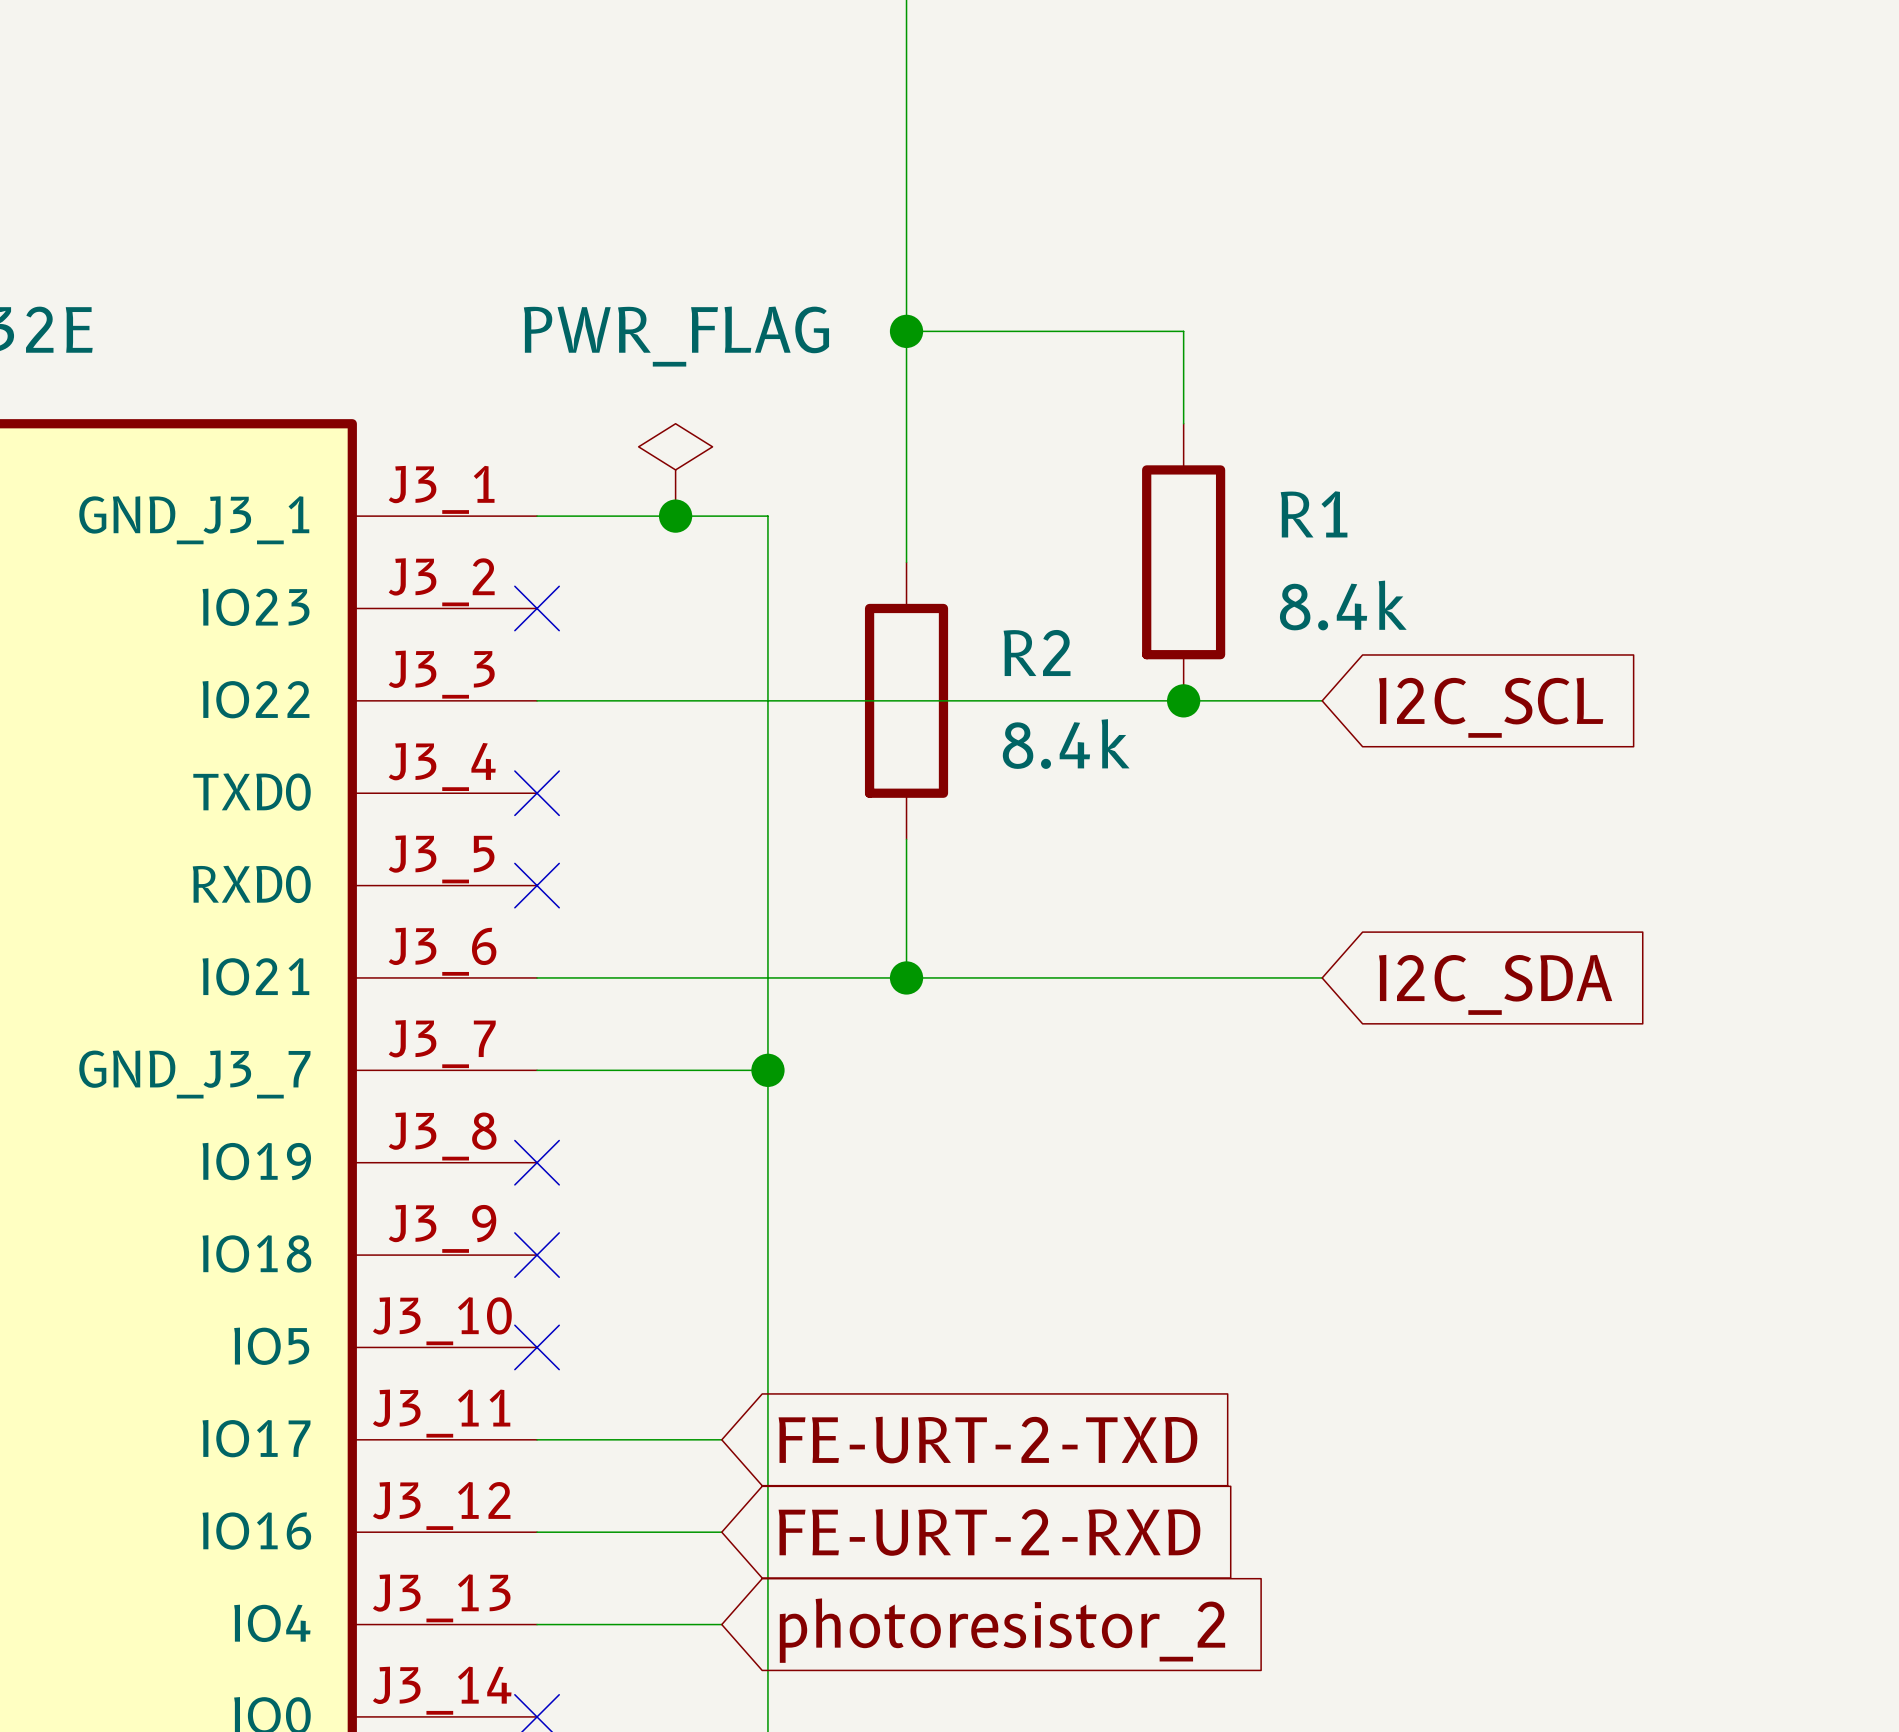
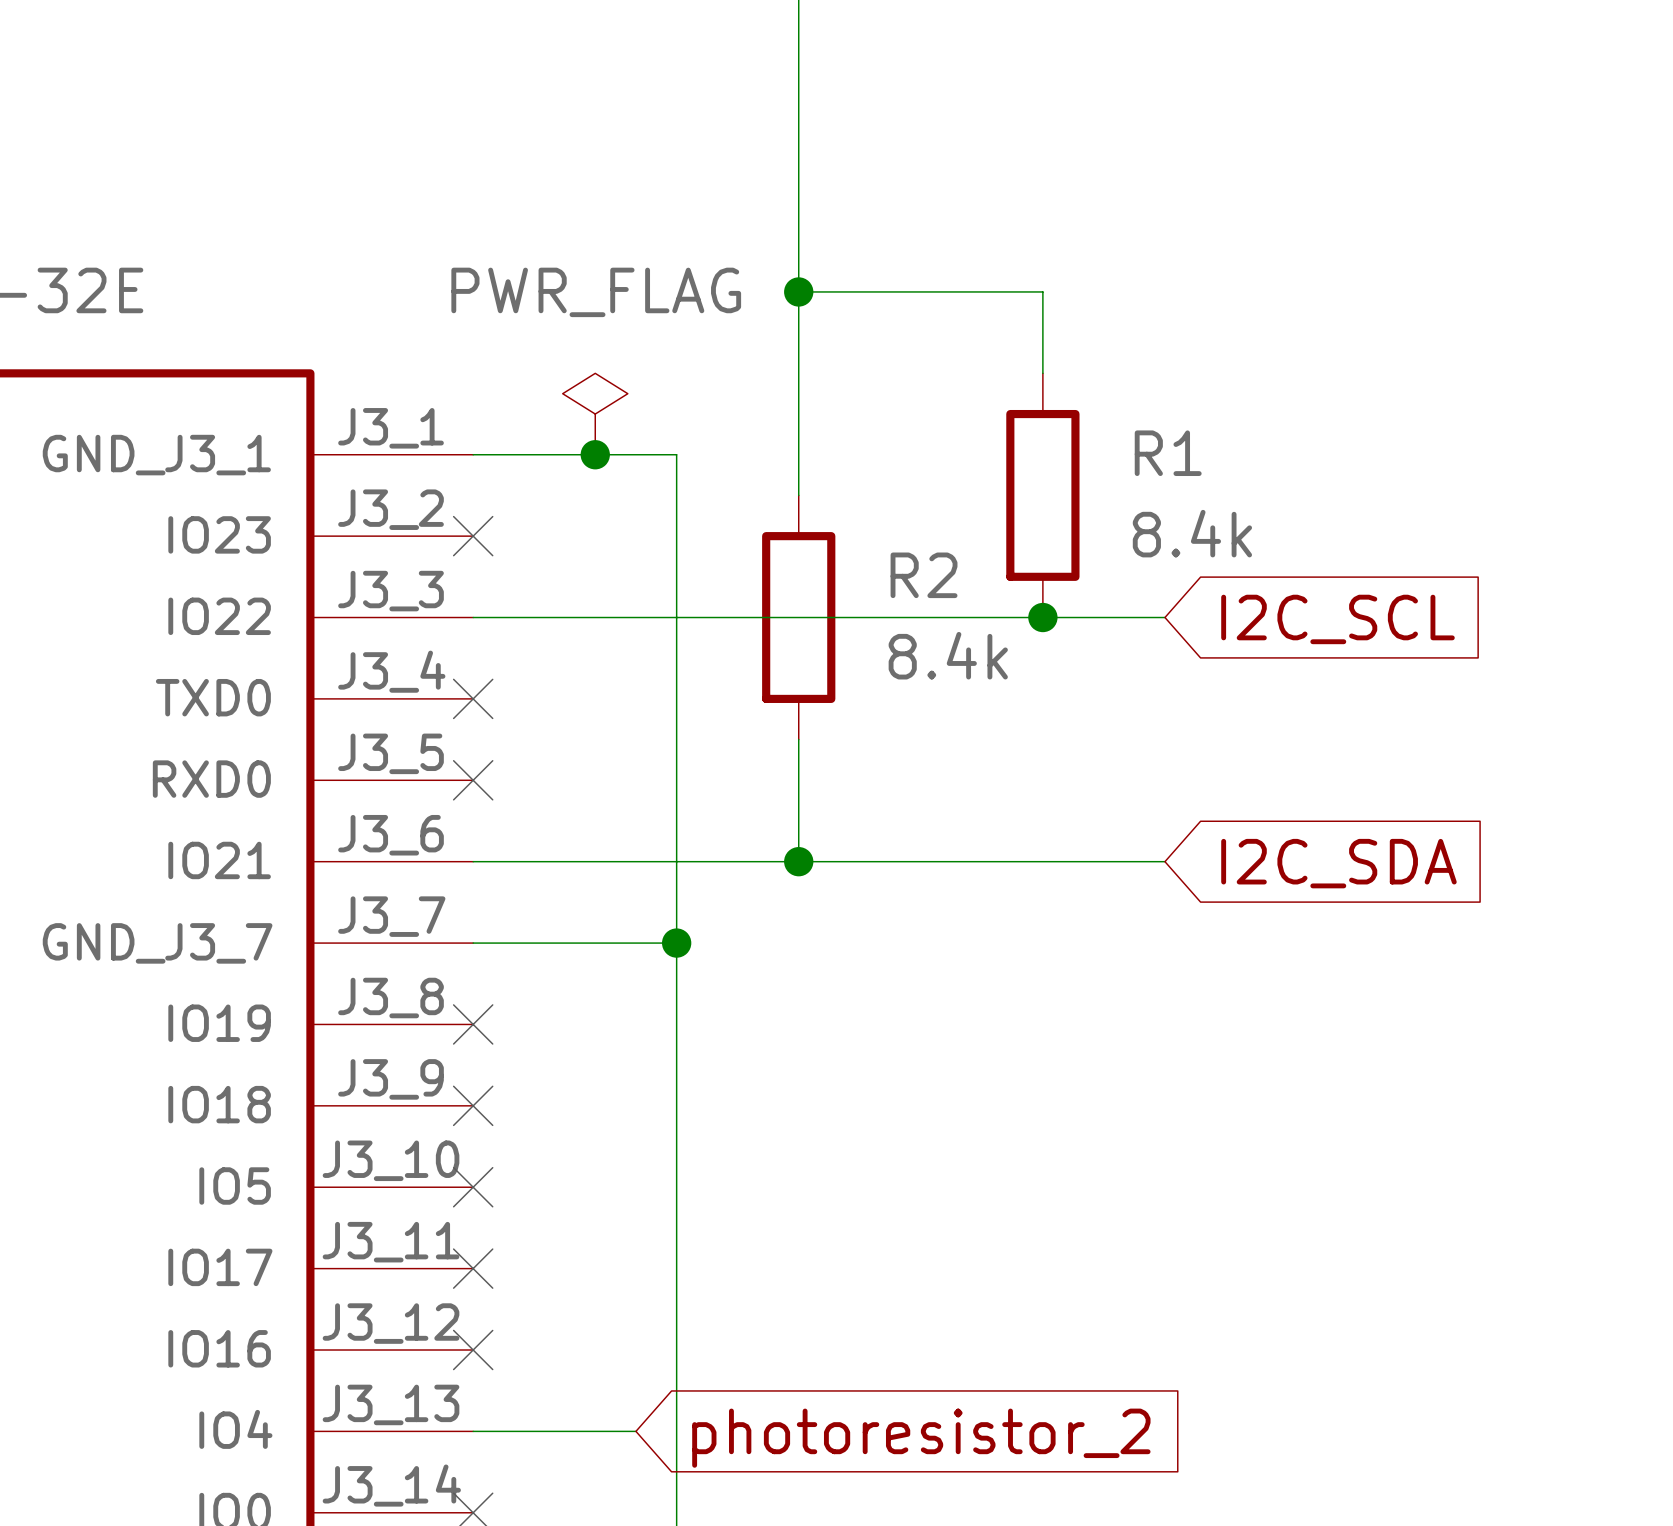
wire: (537, 1439) (721, 1439) -> none
no-connect mark: none -> (473, 1268)
global label: FE-URT-2-TXD (987, 1440) -> none
wire: (537, 1532) (721, 1532) -> none
no-connect mark: none -> (473, 1350)
global label: FE-URT-2-RXD (989, 1532) -> none

